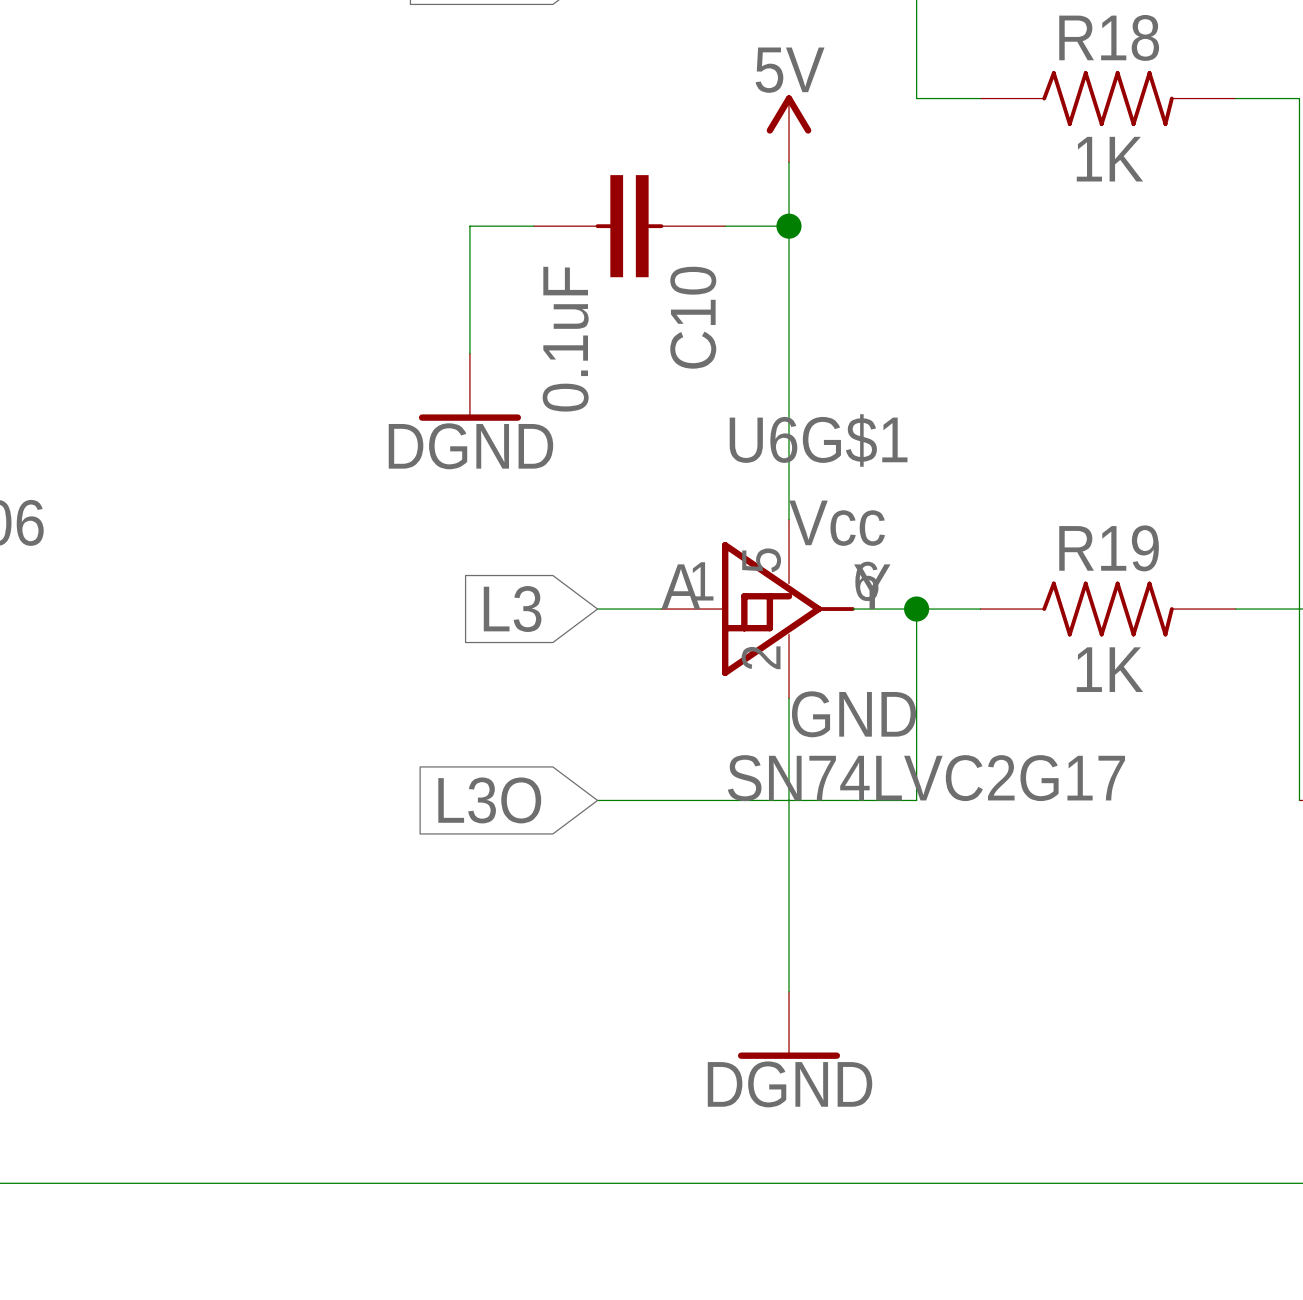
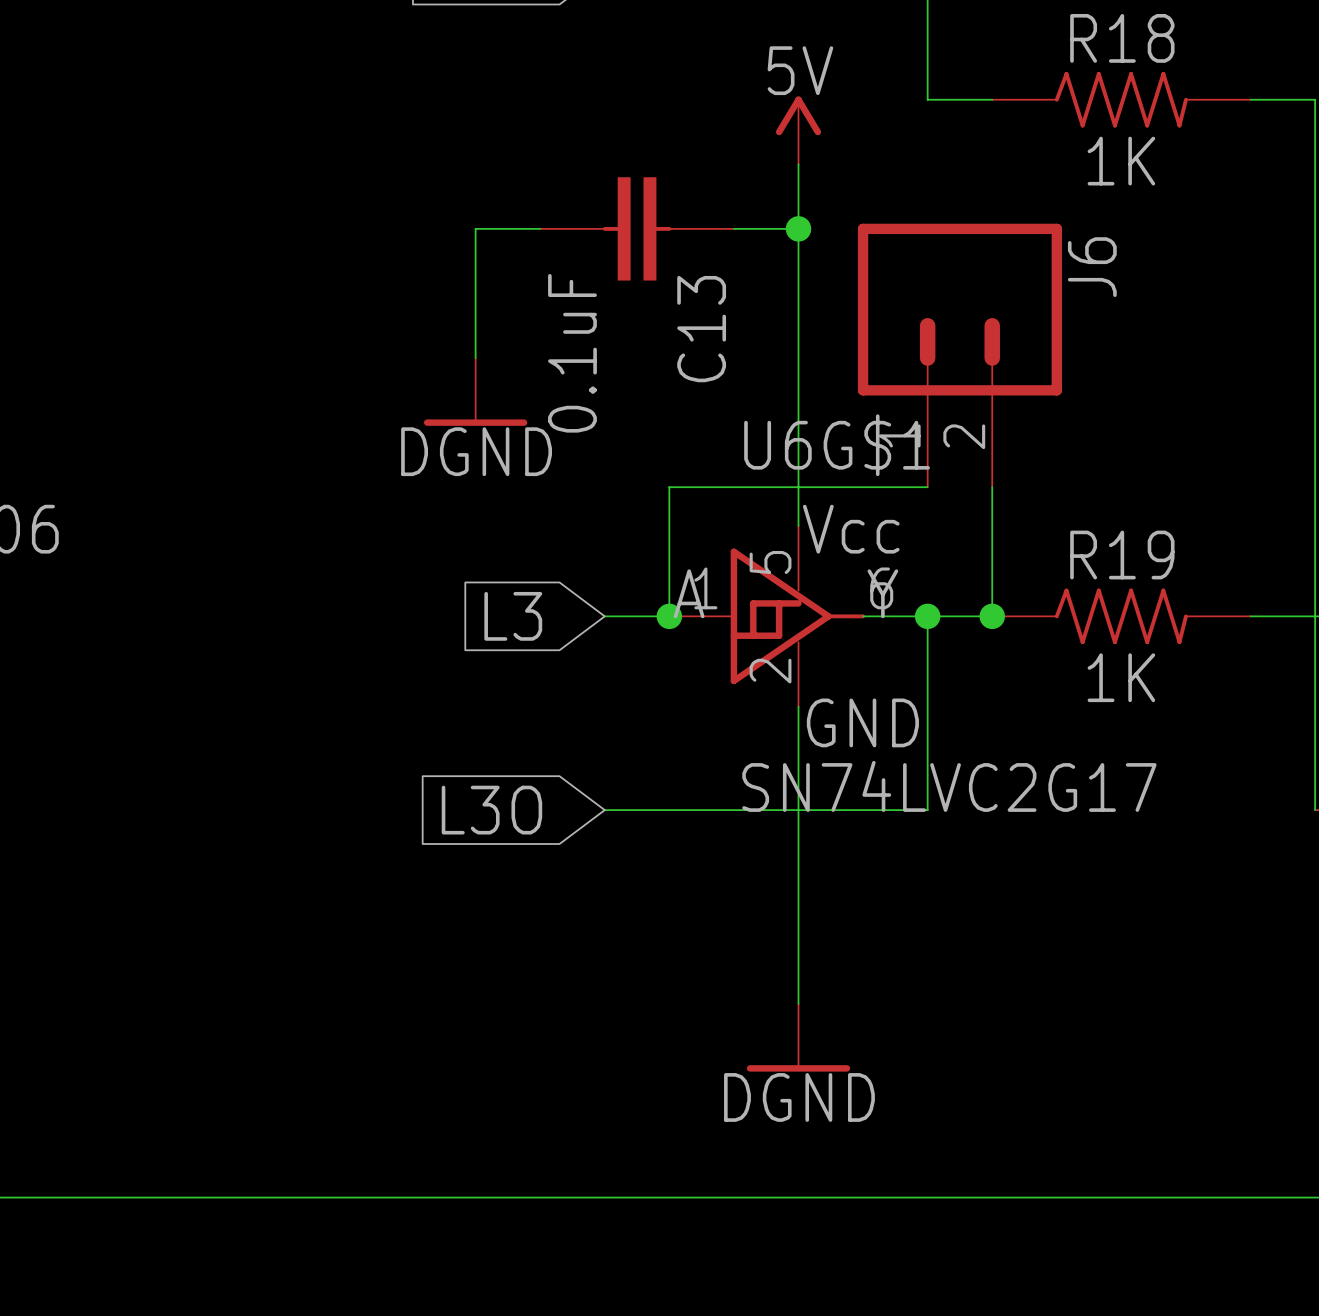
C10 name: C10 (693, 317) -> C13 (701, 329)
J6: none -> (959, 355)
wire: none -> (927, 487) (669, 487) (669, 616)
wire: none -> (992, 487) (992, 616)
junction: none -> (669, 616)
junction: none -> (992, 616)

